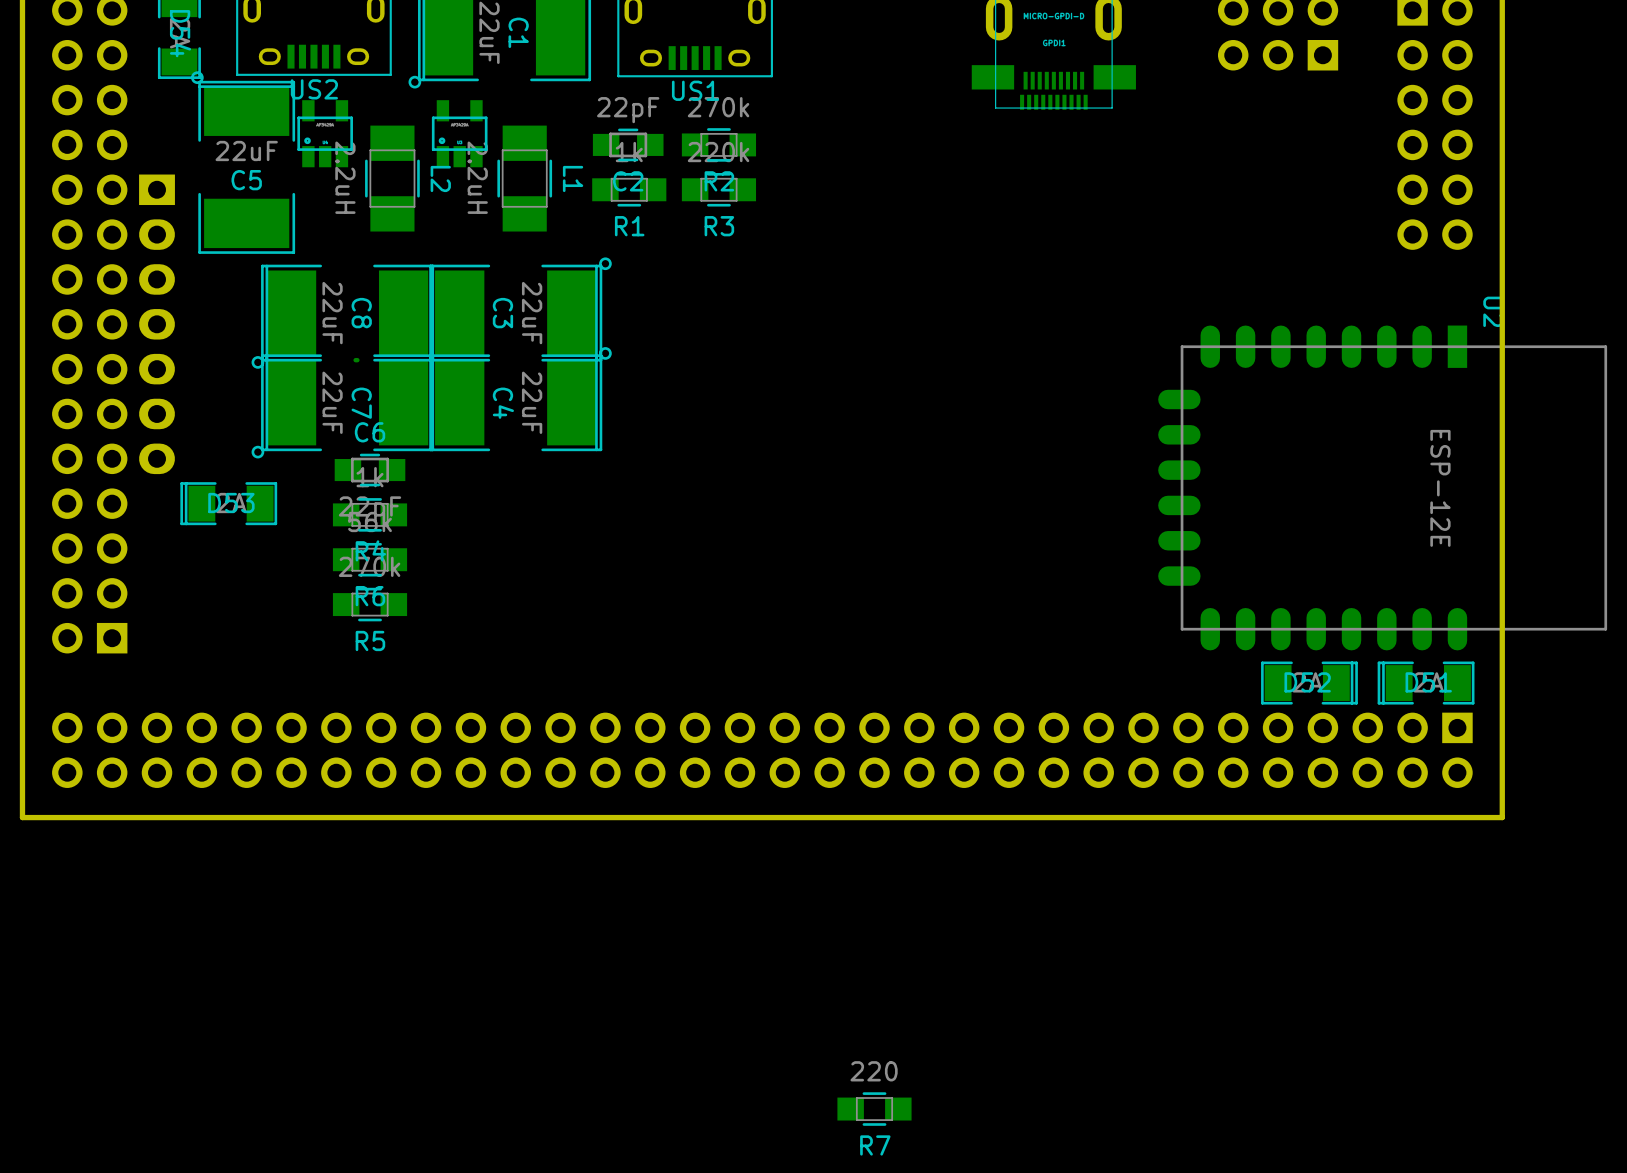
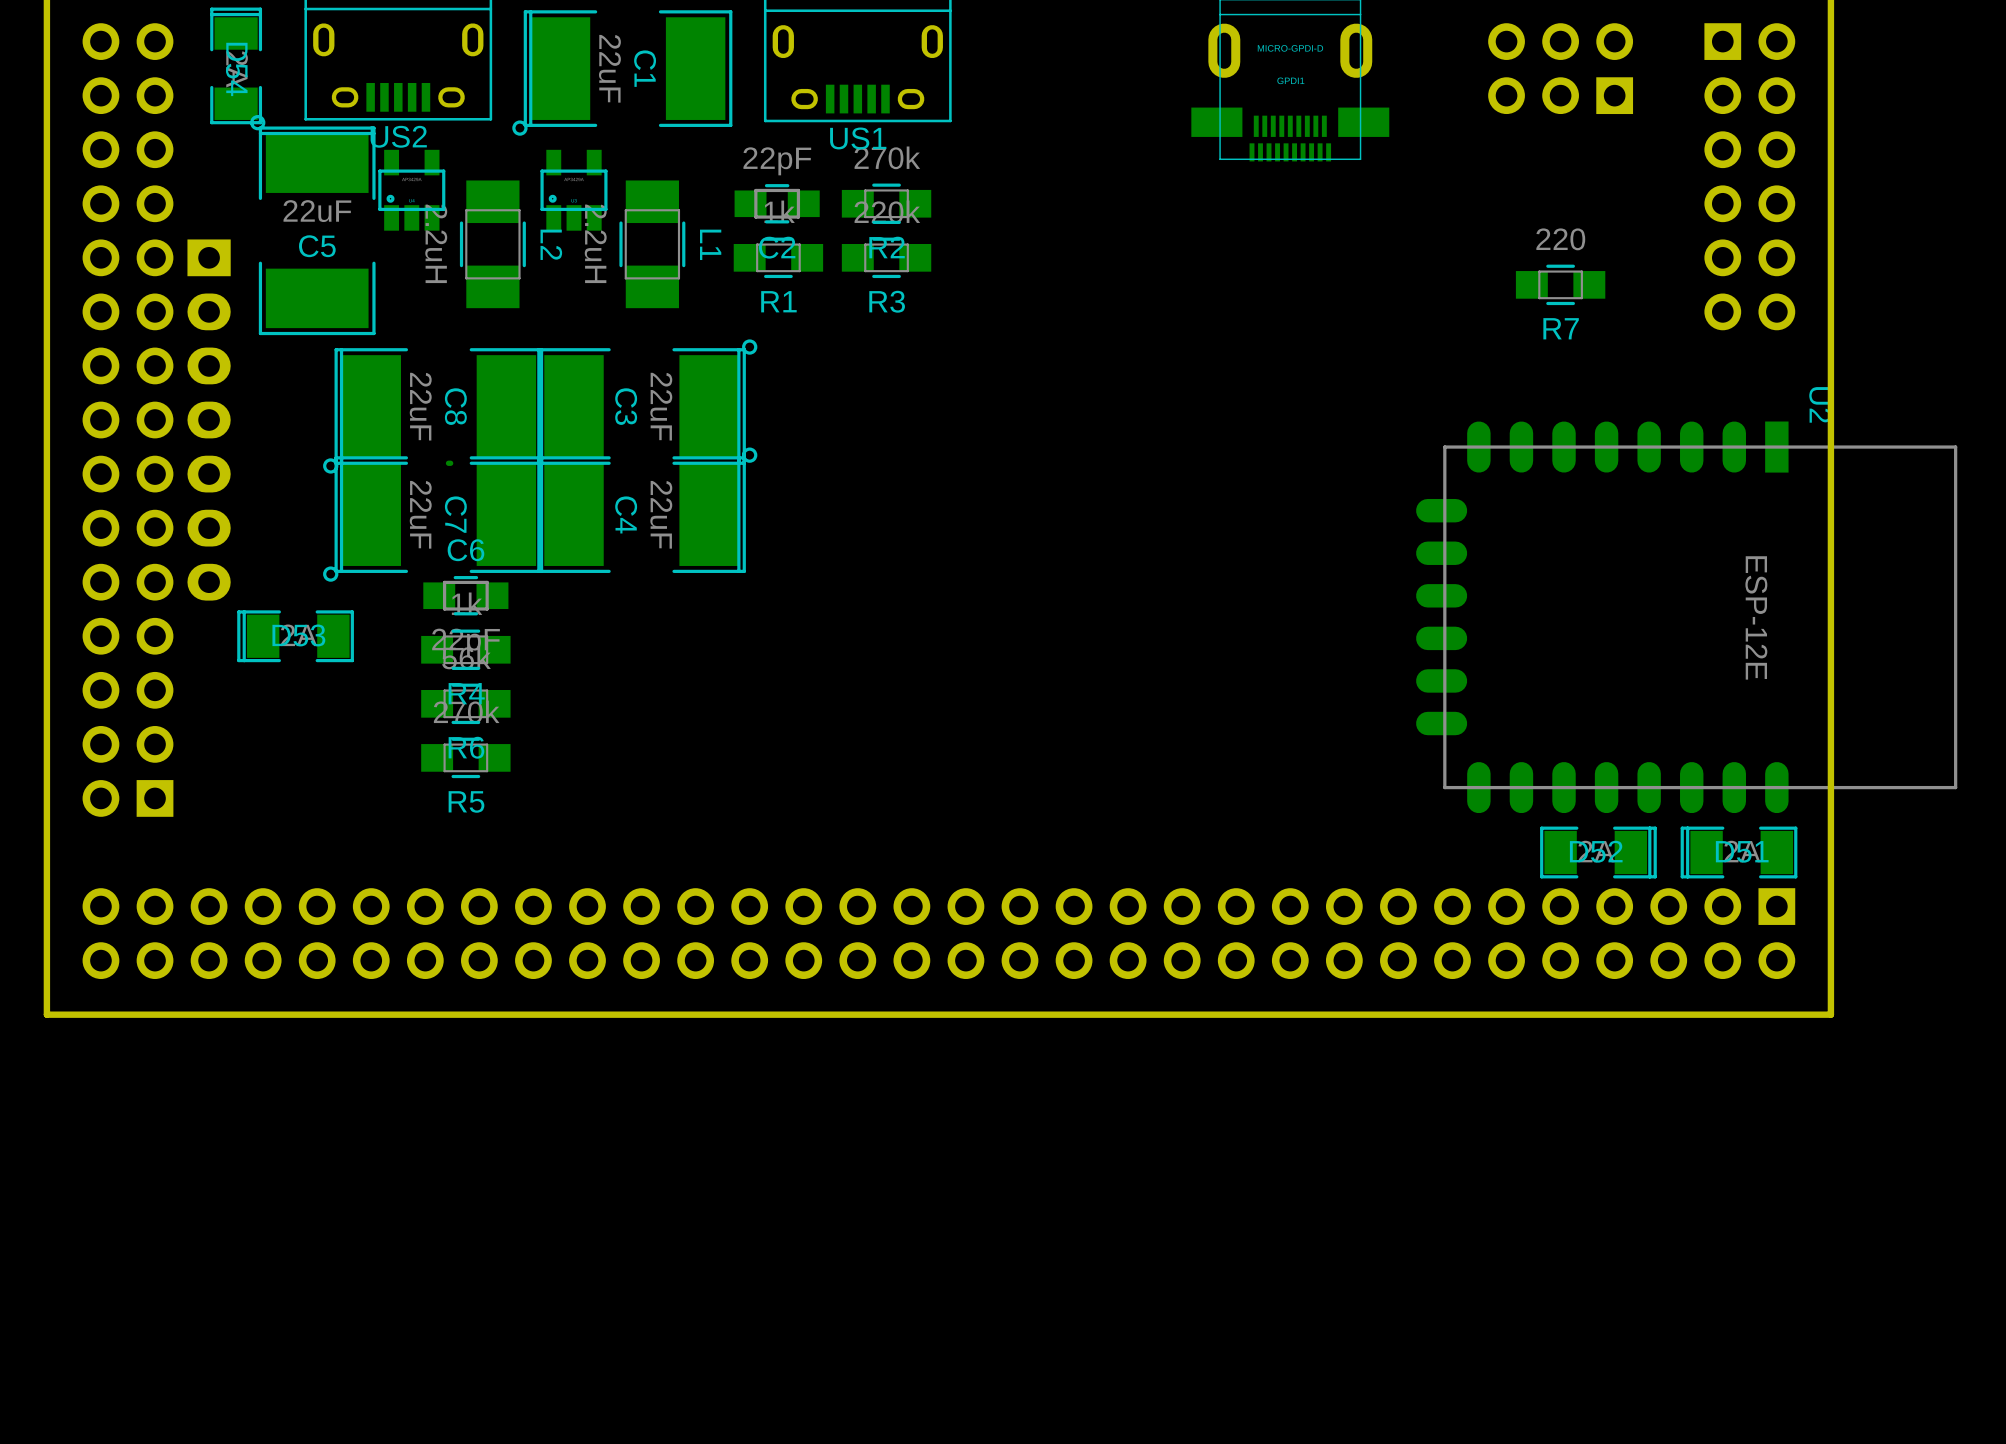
R7 position: (874, 1109) -> (1560, 284)

